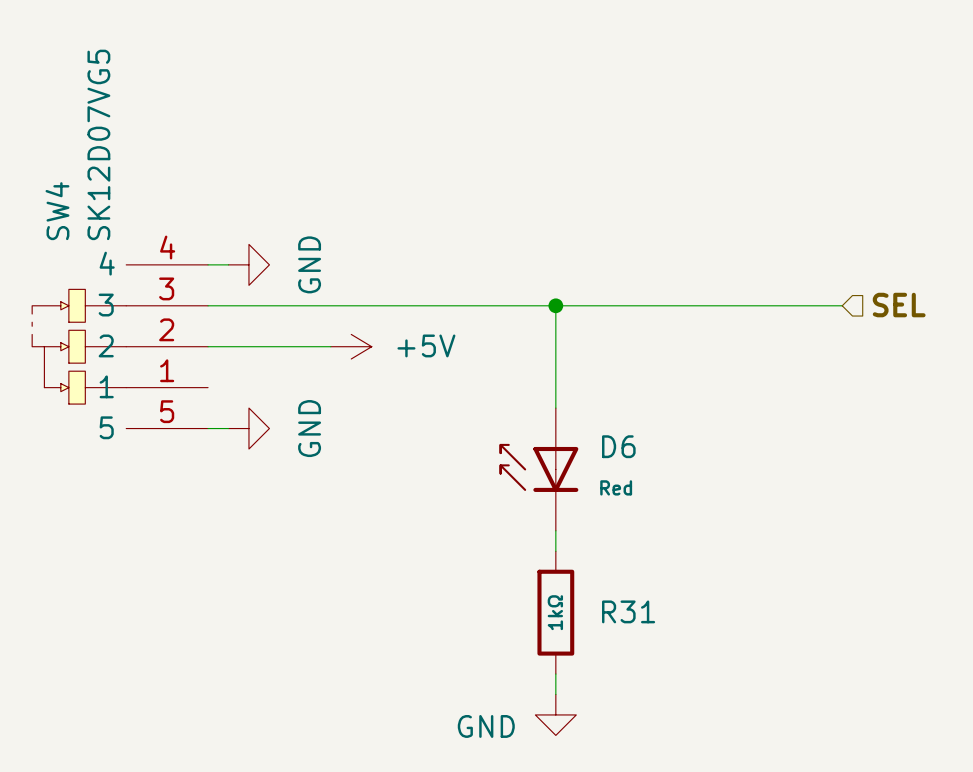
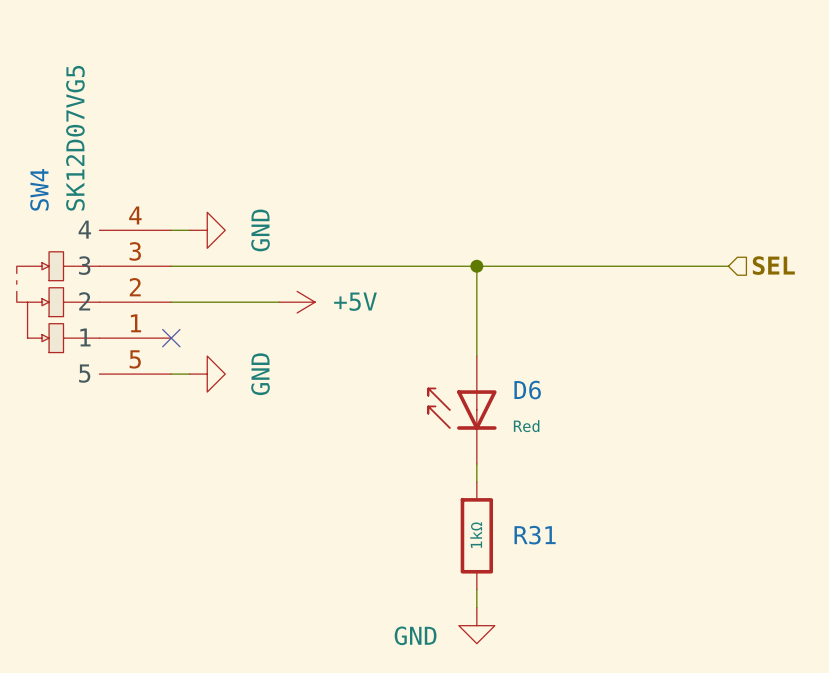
no-connect mark: none -> (171, 338)

